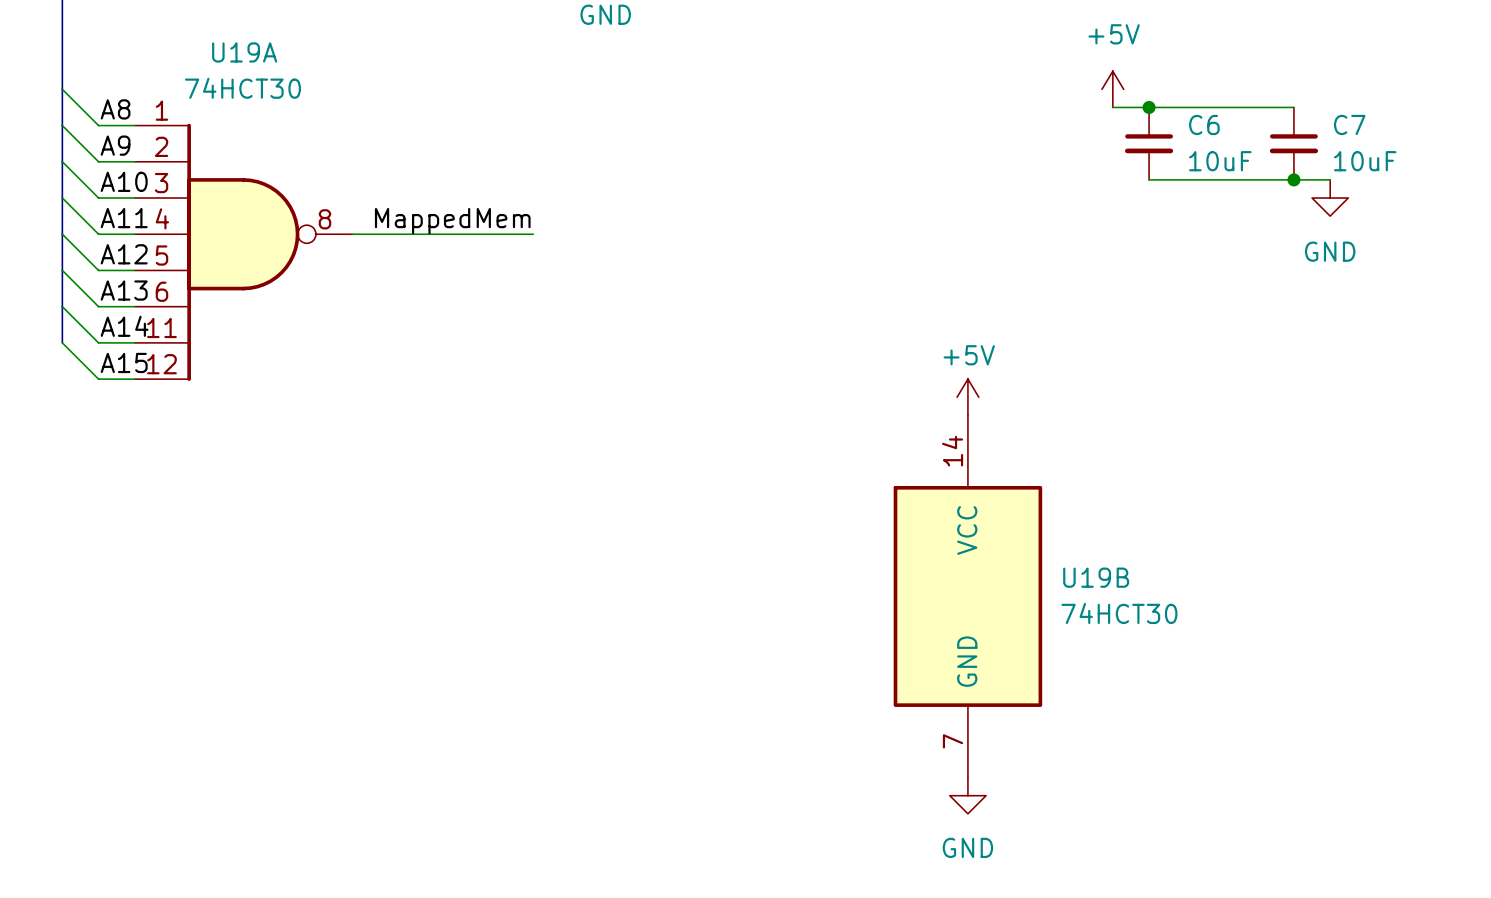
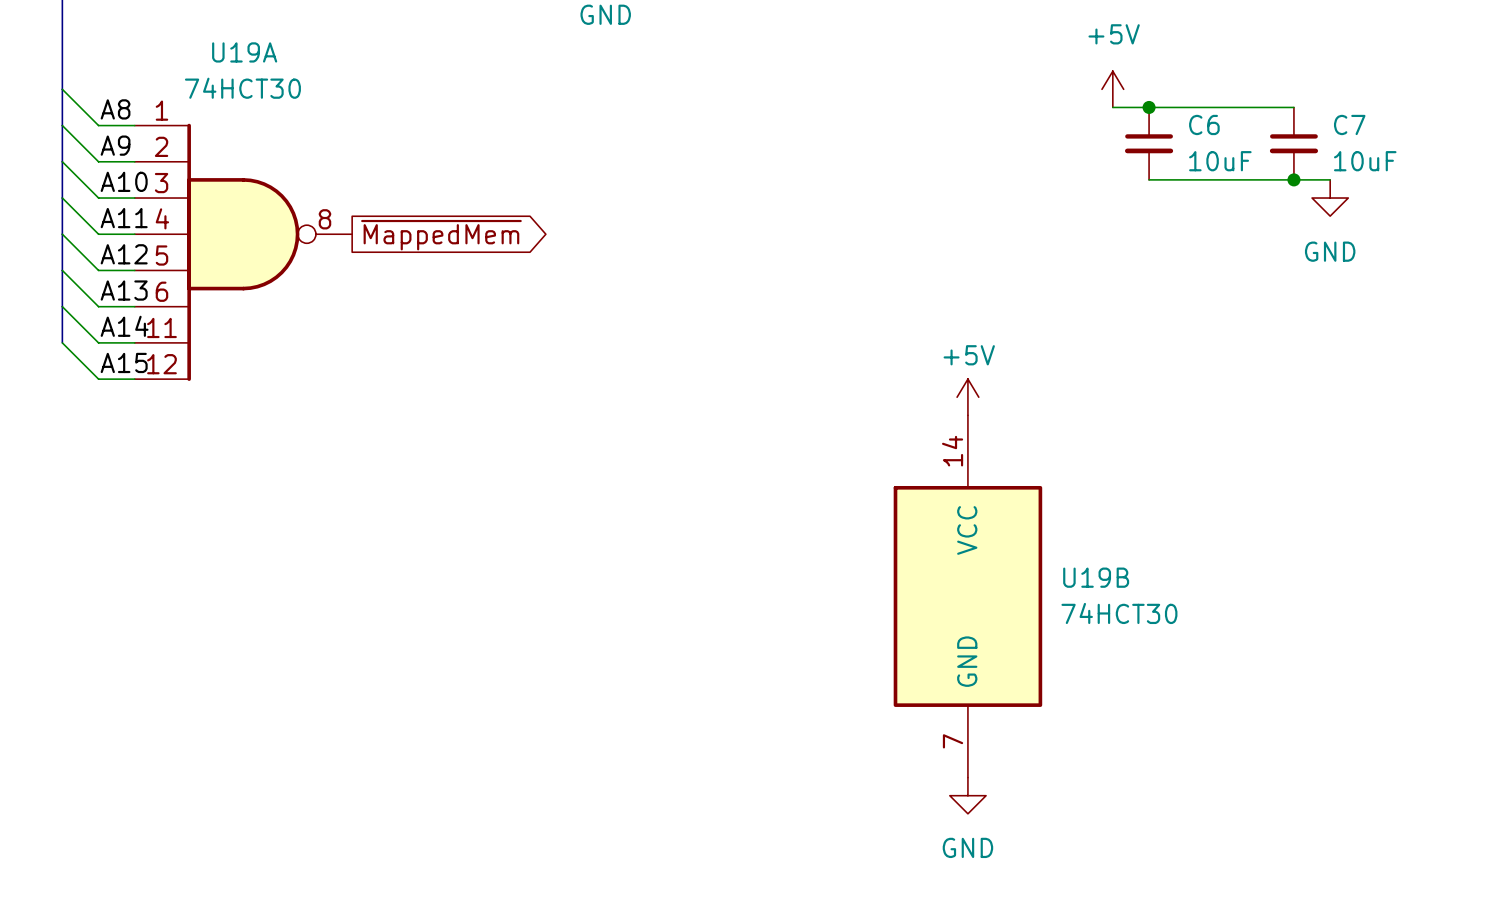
label: MappedMem (452, 221) -> none
wire: (352, 234) (533, 234) -> none
global label: none -> ~{MappedMem} (441, 235)

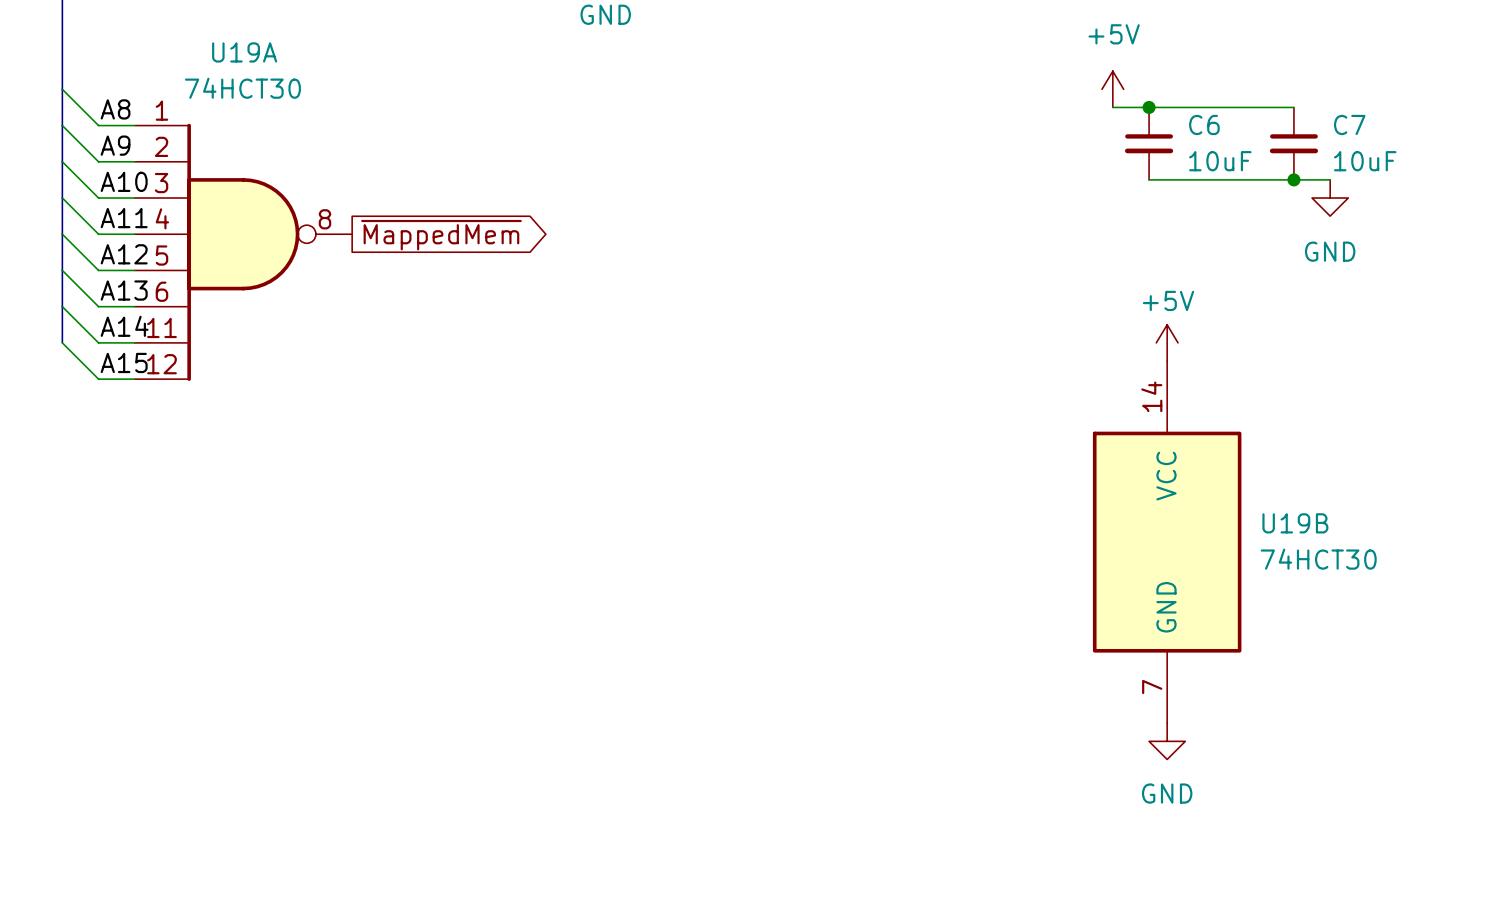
power symbol position: +5V (967, 397) -> +5V (1167, 342)
U19B position: (967, 596) -> (1167, 542)
power symbol position: GND (967, 795) -> GND (1167, 741)

